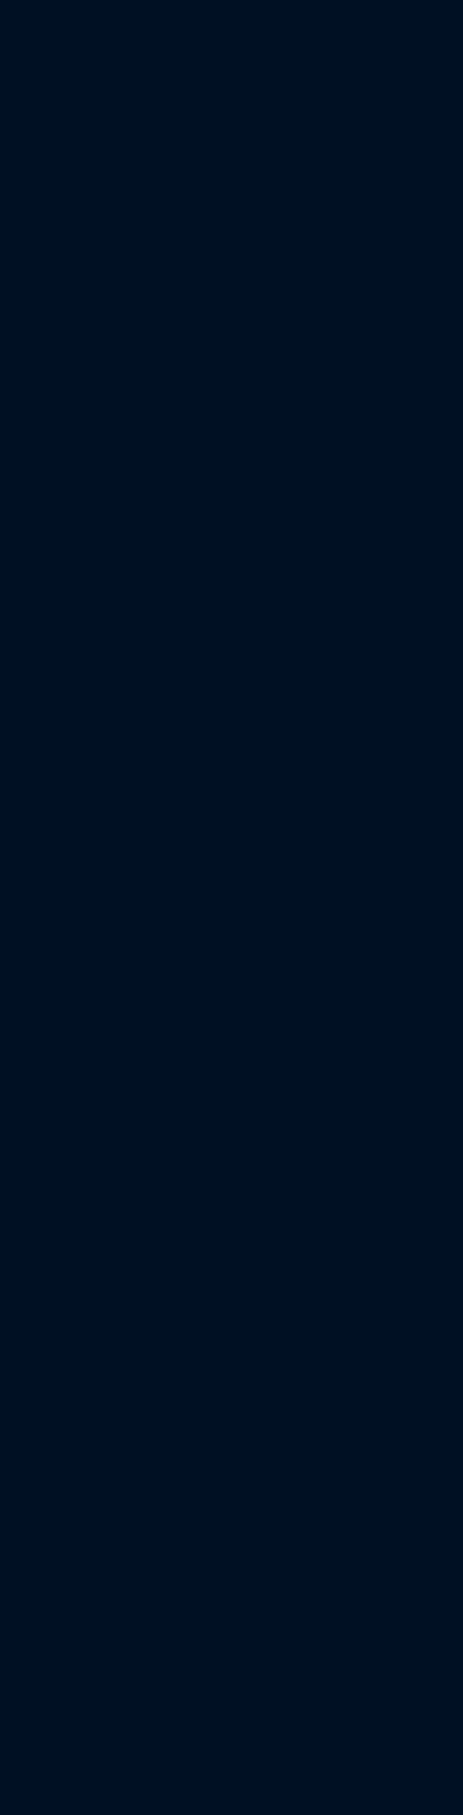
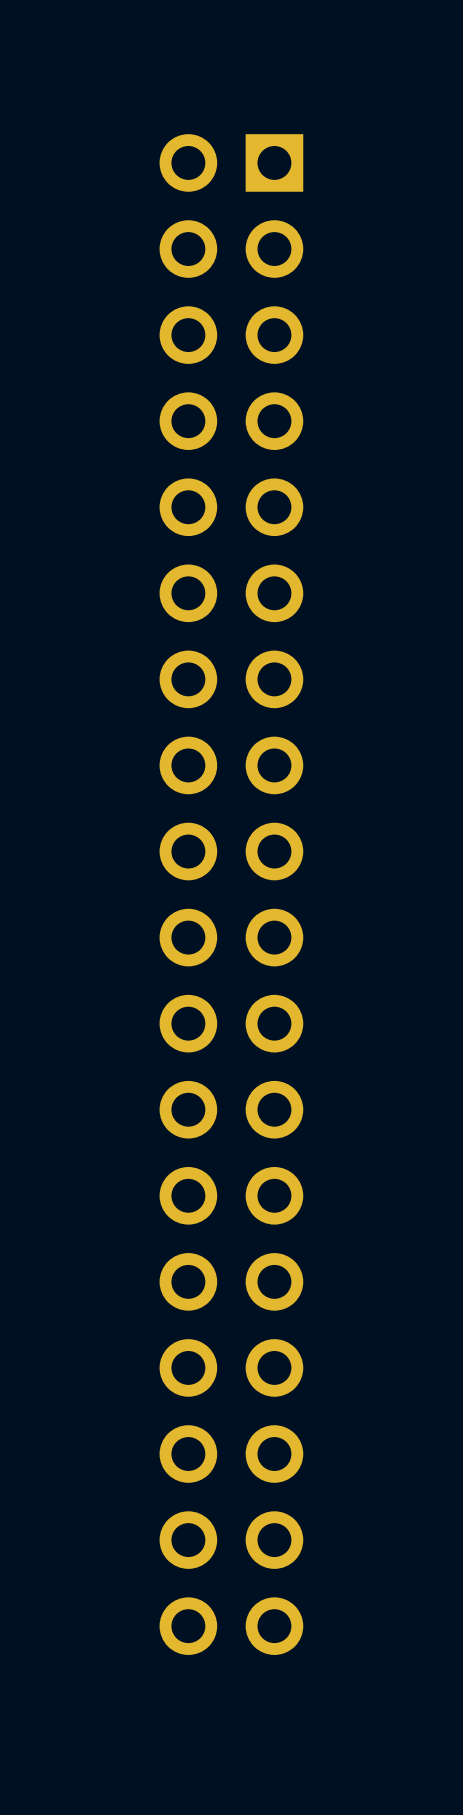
part: none -> (231, 894)

